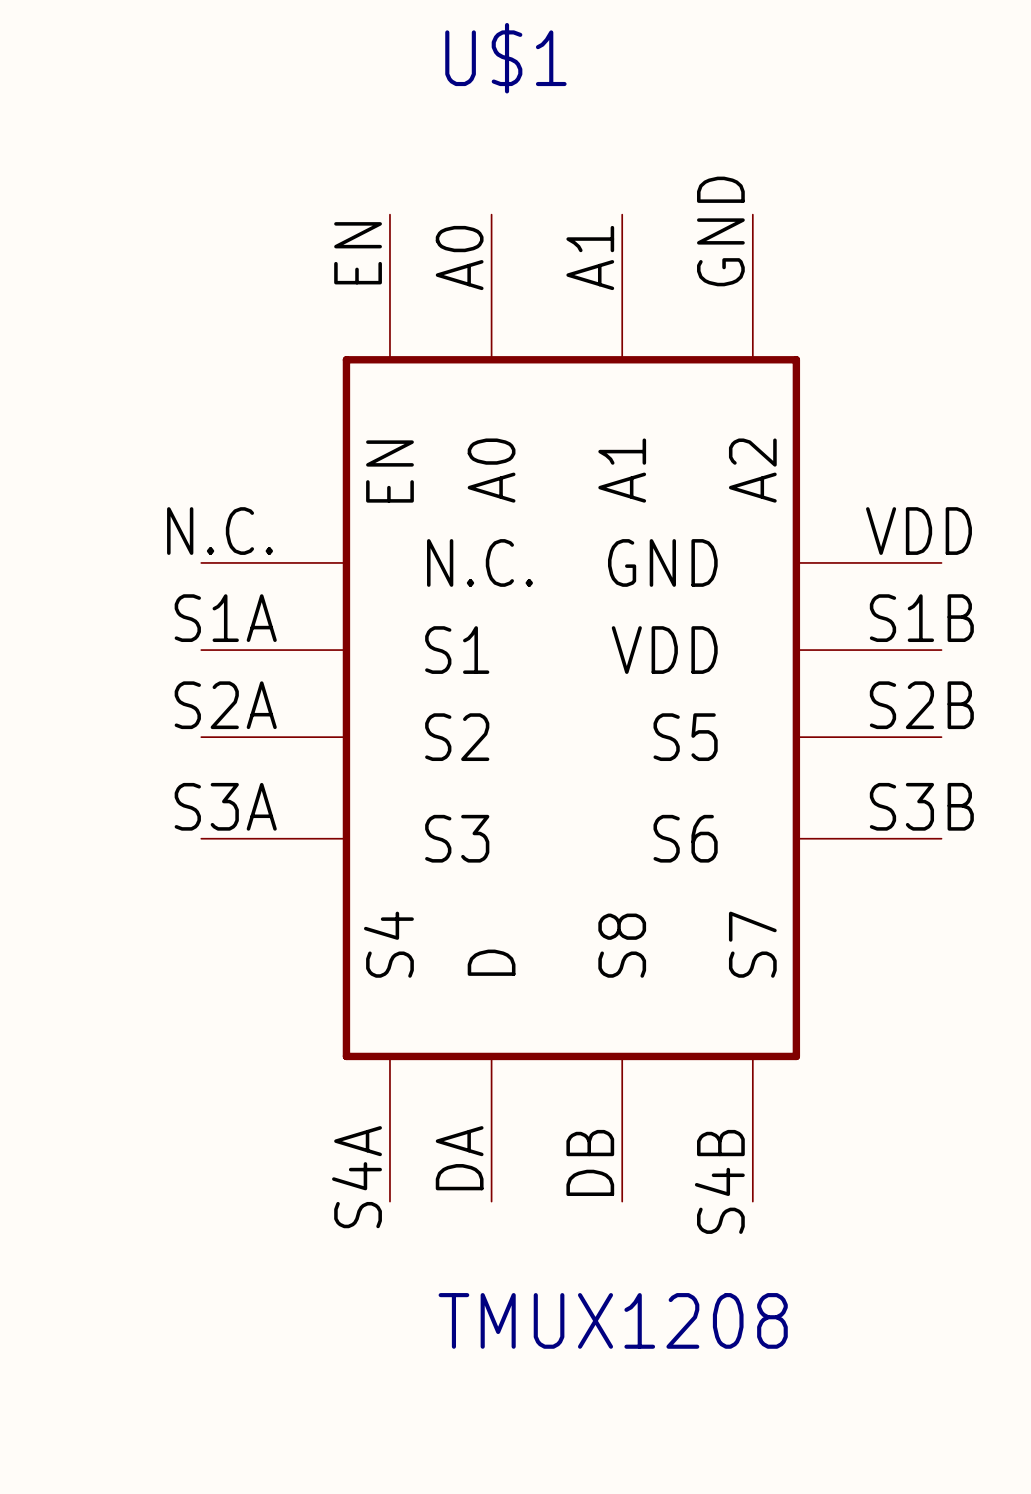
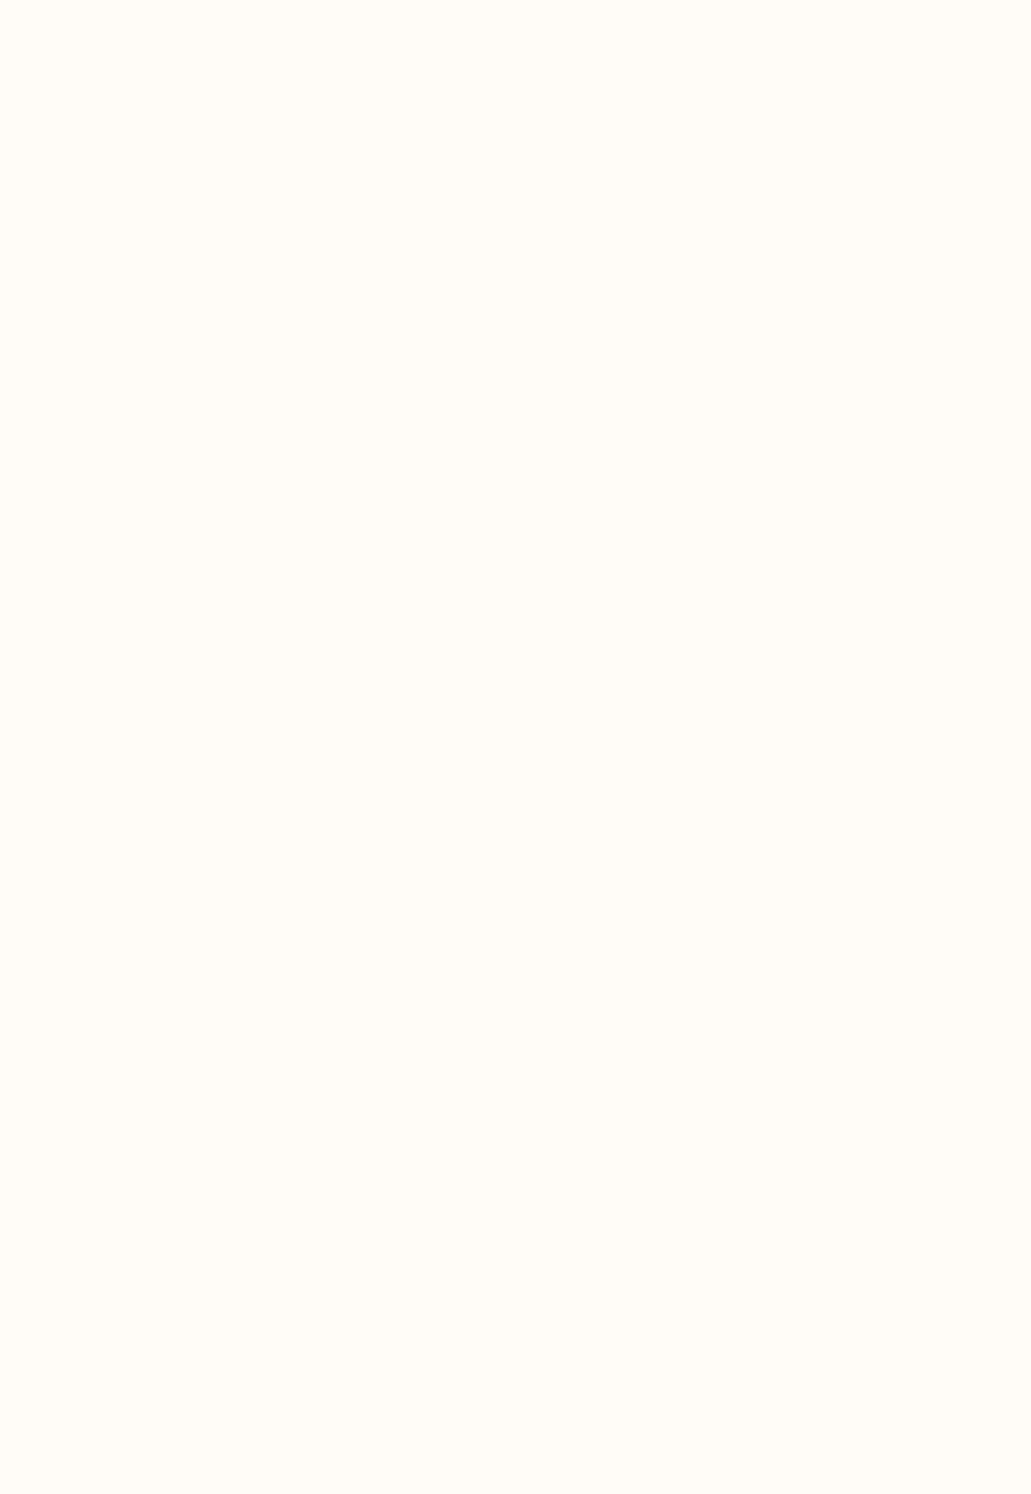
U$1: TMUX1208 (571, 708) -> none

